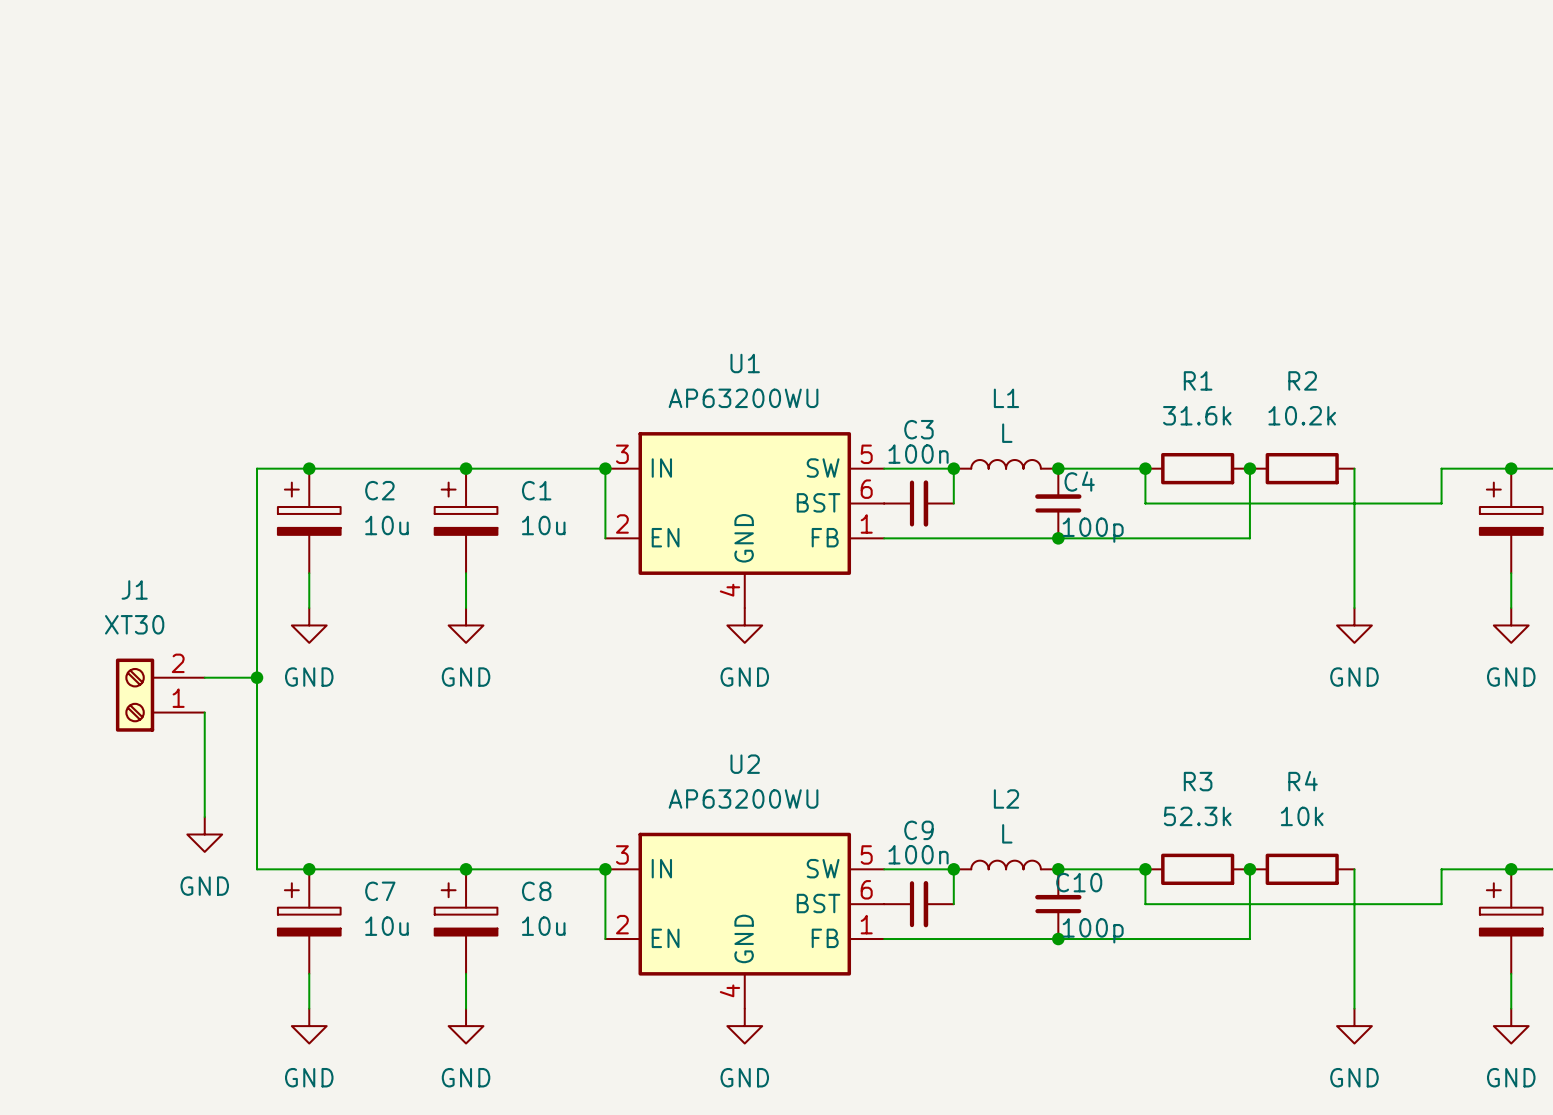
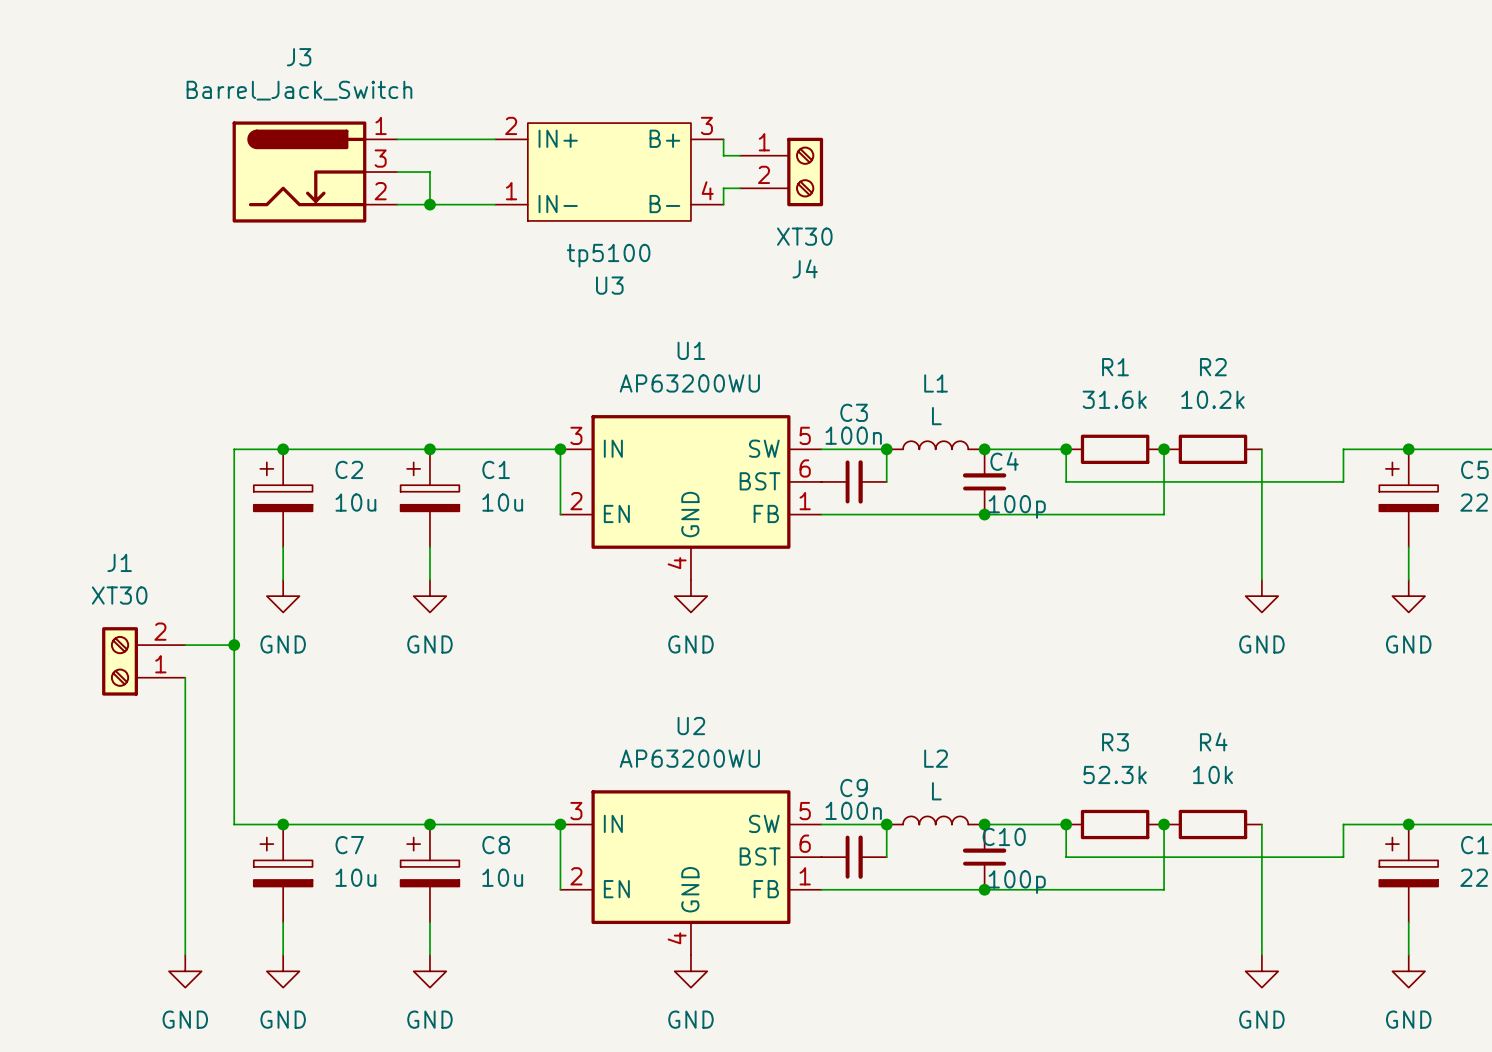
wire: none -> (397, 139) (495, 139)
wire: none -> (723, 139) (723, 155) (739, 155)
J3: none -> Barrel_Jack_Switch (314, 172)
wire: none -> (397, 172) (429, 172) (429, 204)
U3: none -> tp5100 (609, 172)
J4: none -> XT30 (781, 172)
wire: none -> (739, 188) (723, 188) (723, 204)
wire: none -> (397, 204) (495, 204)
junction: none -> (429, 204)
wire: none -> (185, 775) (185, 955)
power symbol position: GND (204, 834) -> GND (185, 971)

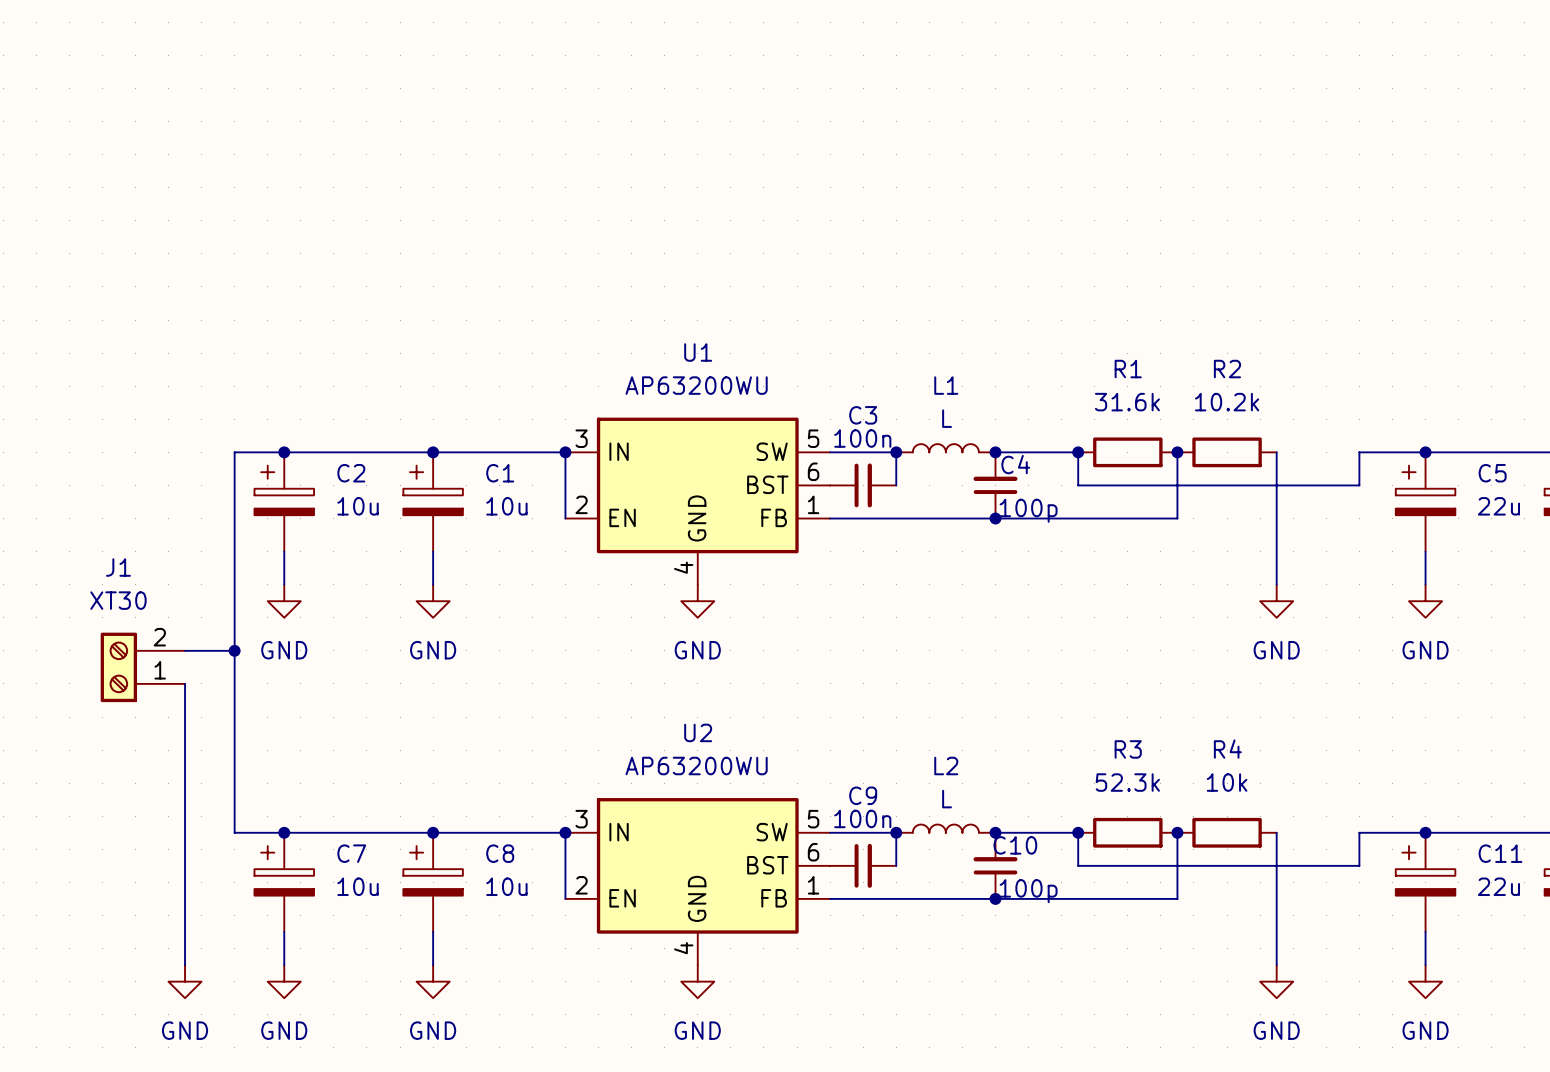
wire: (397, 139) (495, 139) -> none
wire: (723, 139) (723, 155) (739, 155) -> none
J3: Barrel_Jack_Switch (314, 172) -> none
wire: (397, 172) (429, 172) (429, 204) -> none
U3: tp5100 (609, 172) -> none
J4: XT30 (781, 172) -> none
wire: (739, 188) (723, 188) (723, 204) -> none
wire: (397, 204) (495, 204) -> none
junction: (429, 204) -> none

